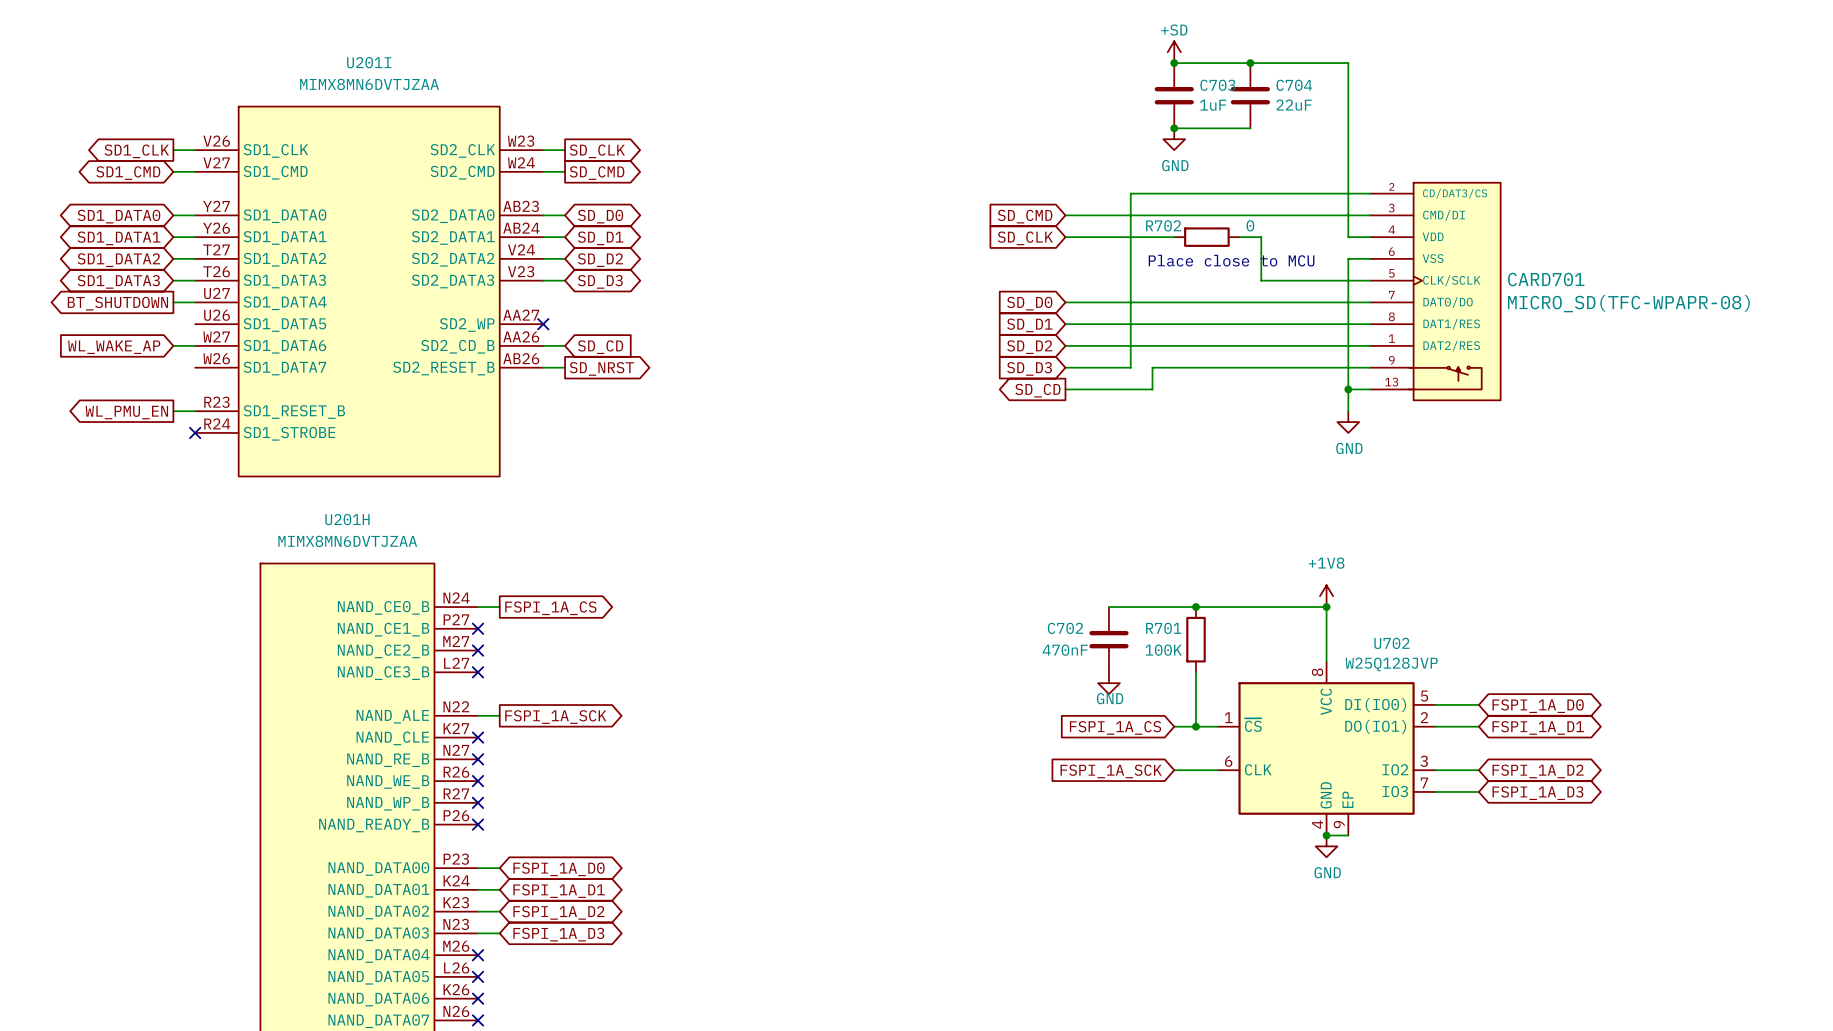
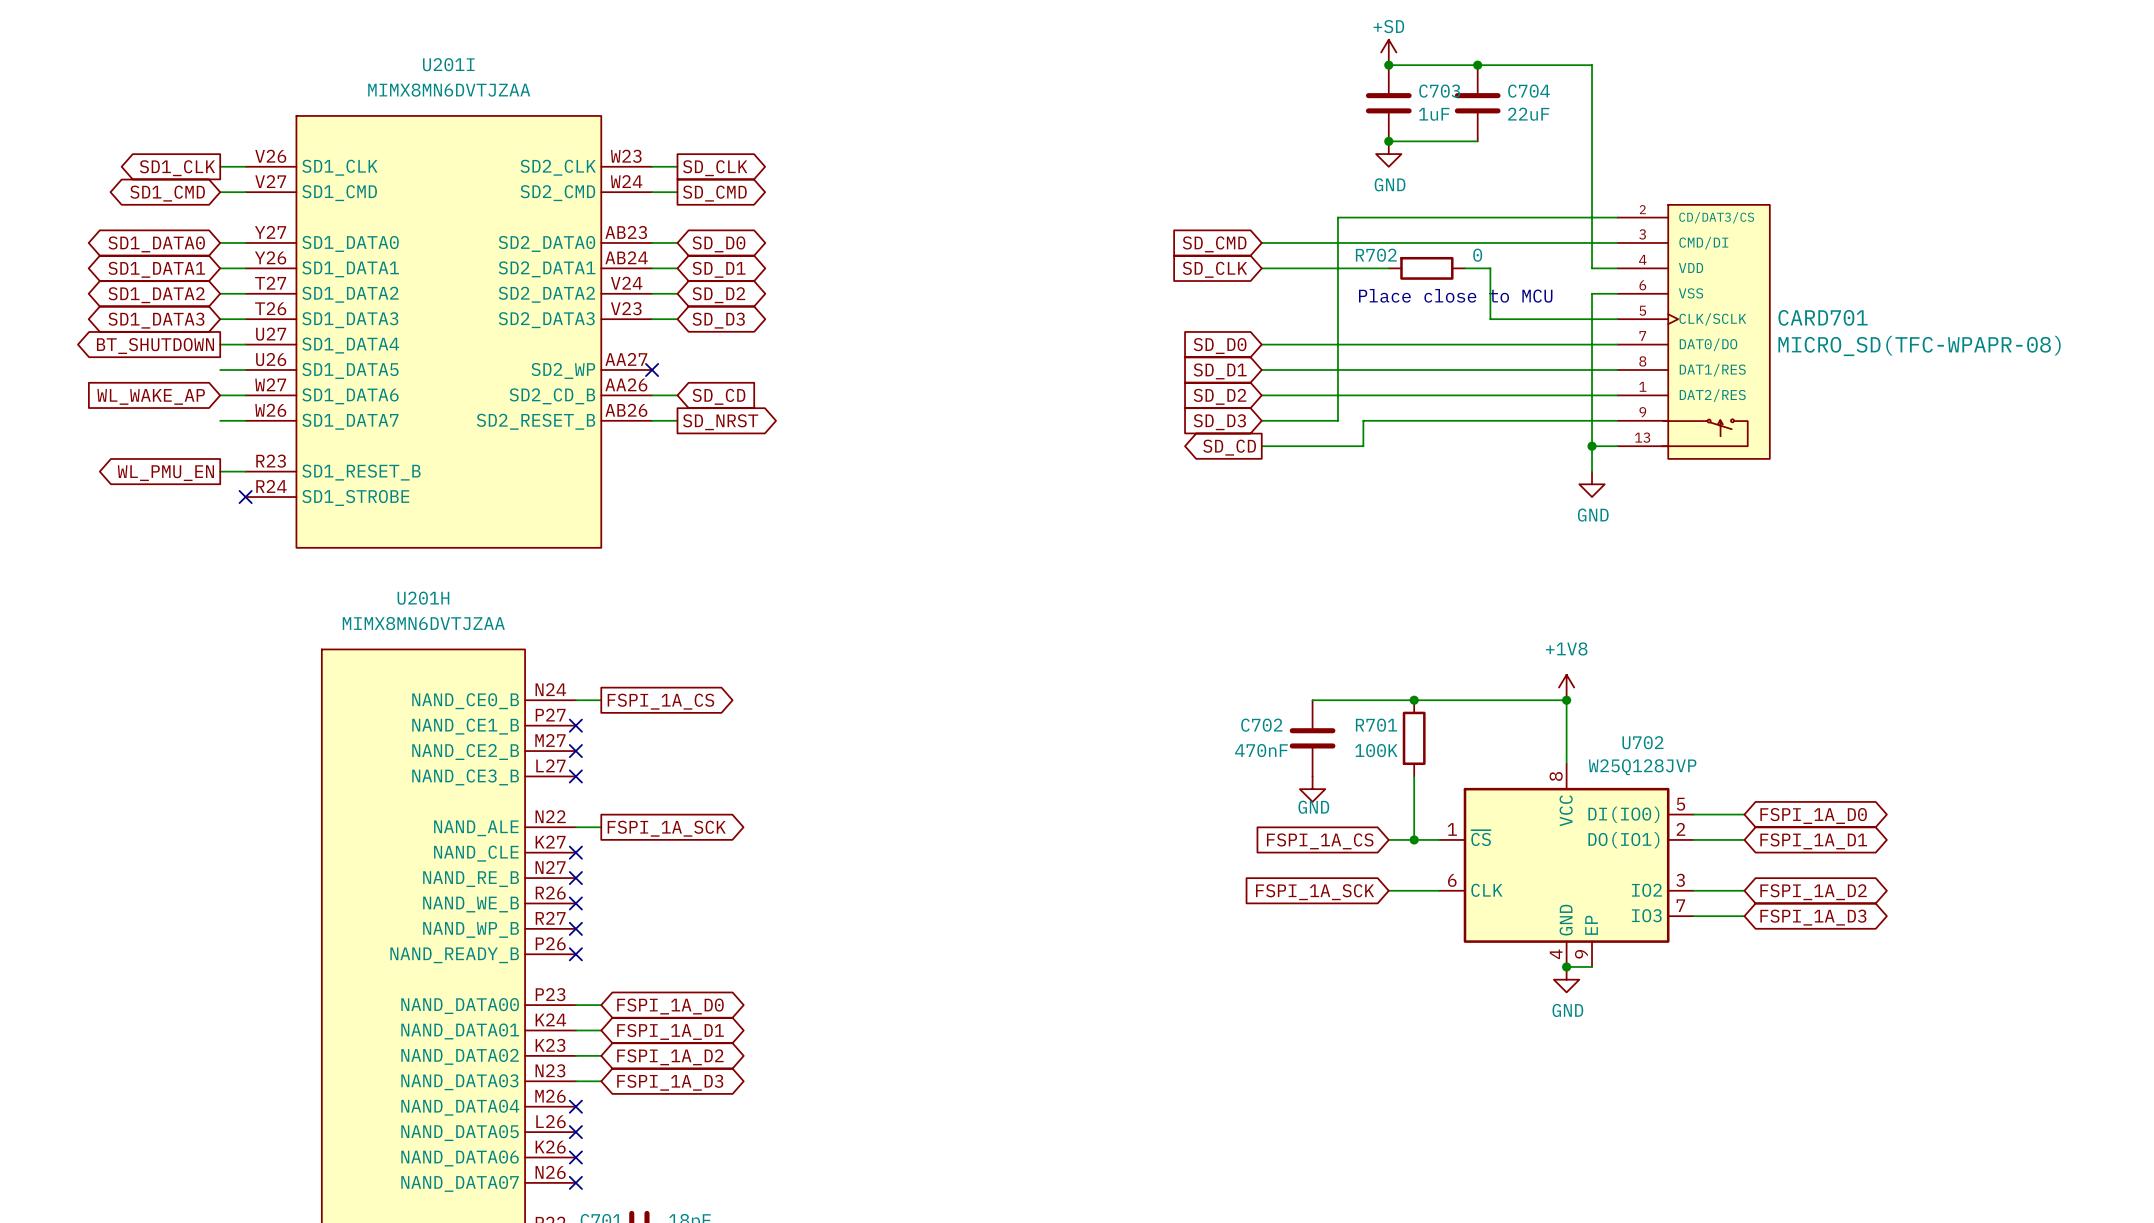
wire: none -> (220, 370) (245, 370)
wire: none -> (220, 420) (245, 420)

